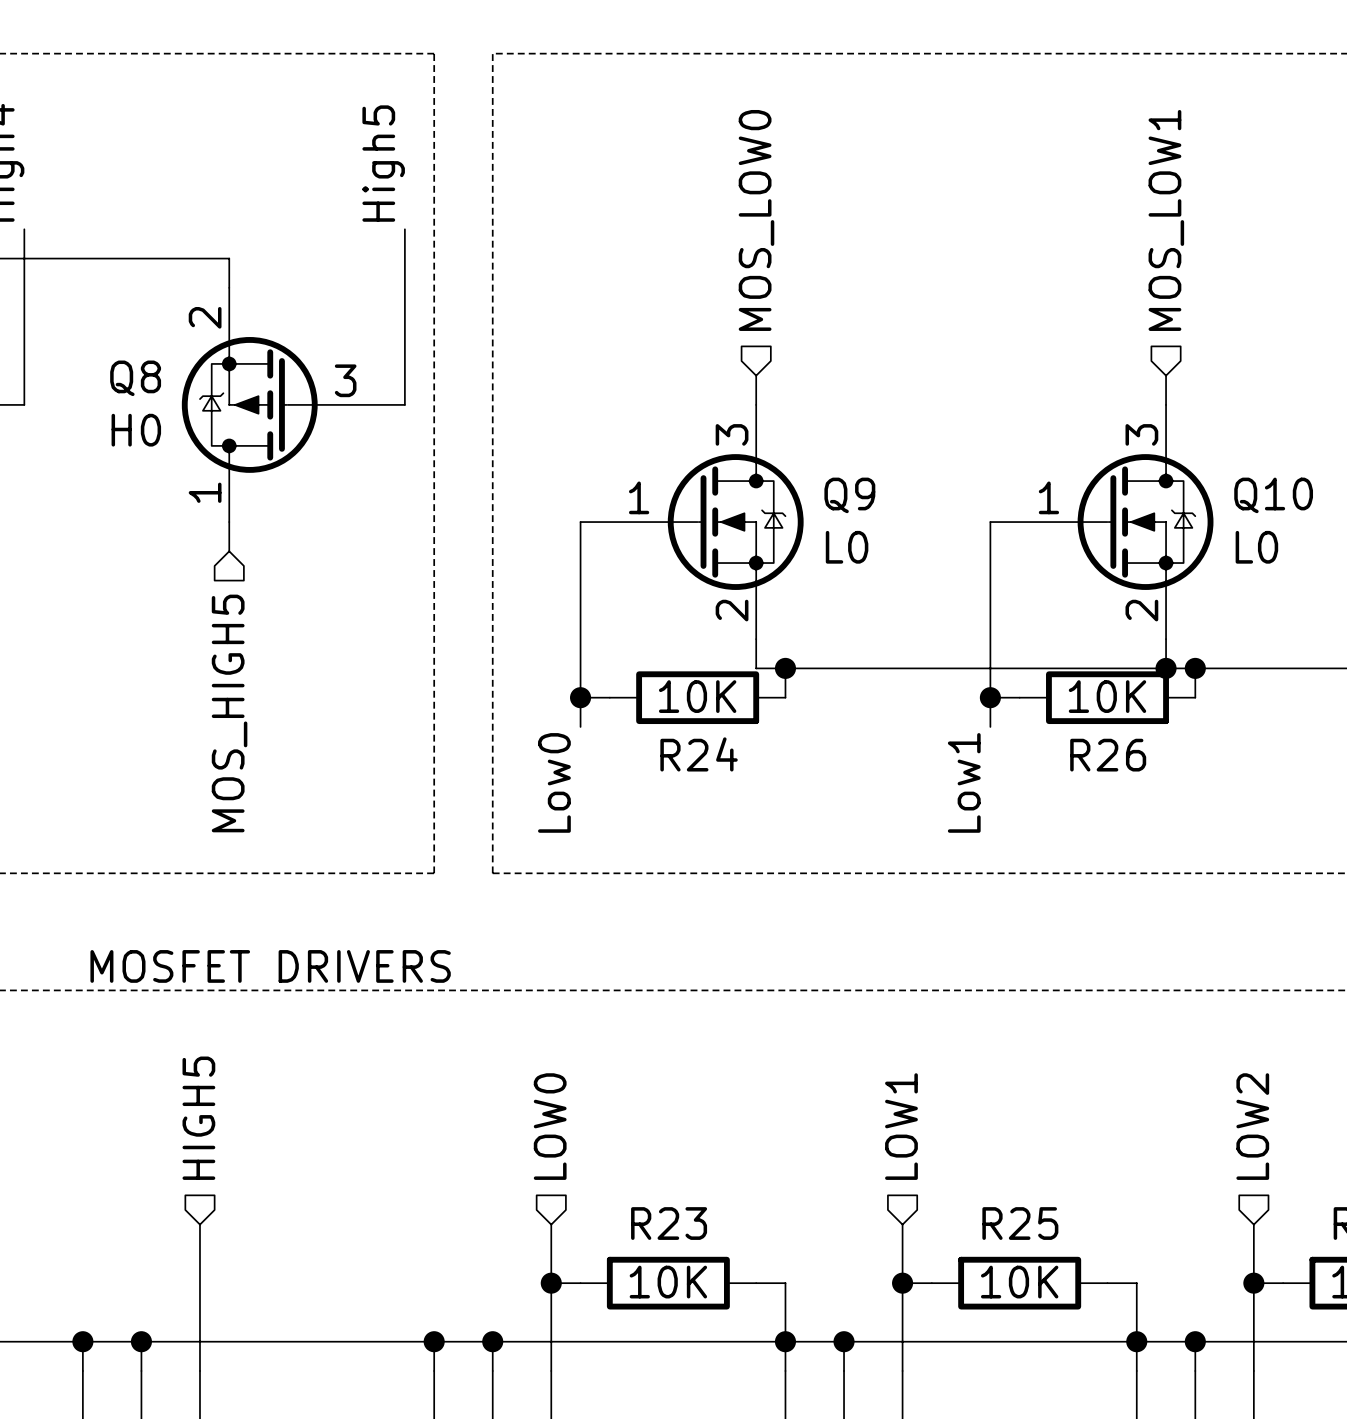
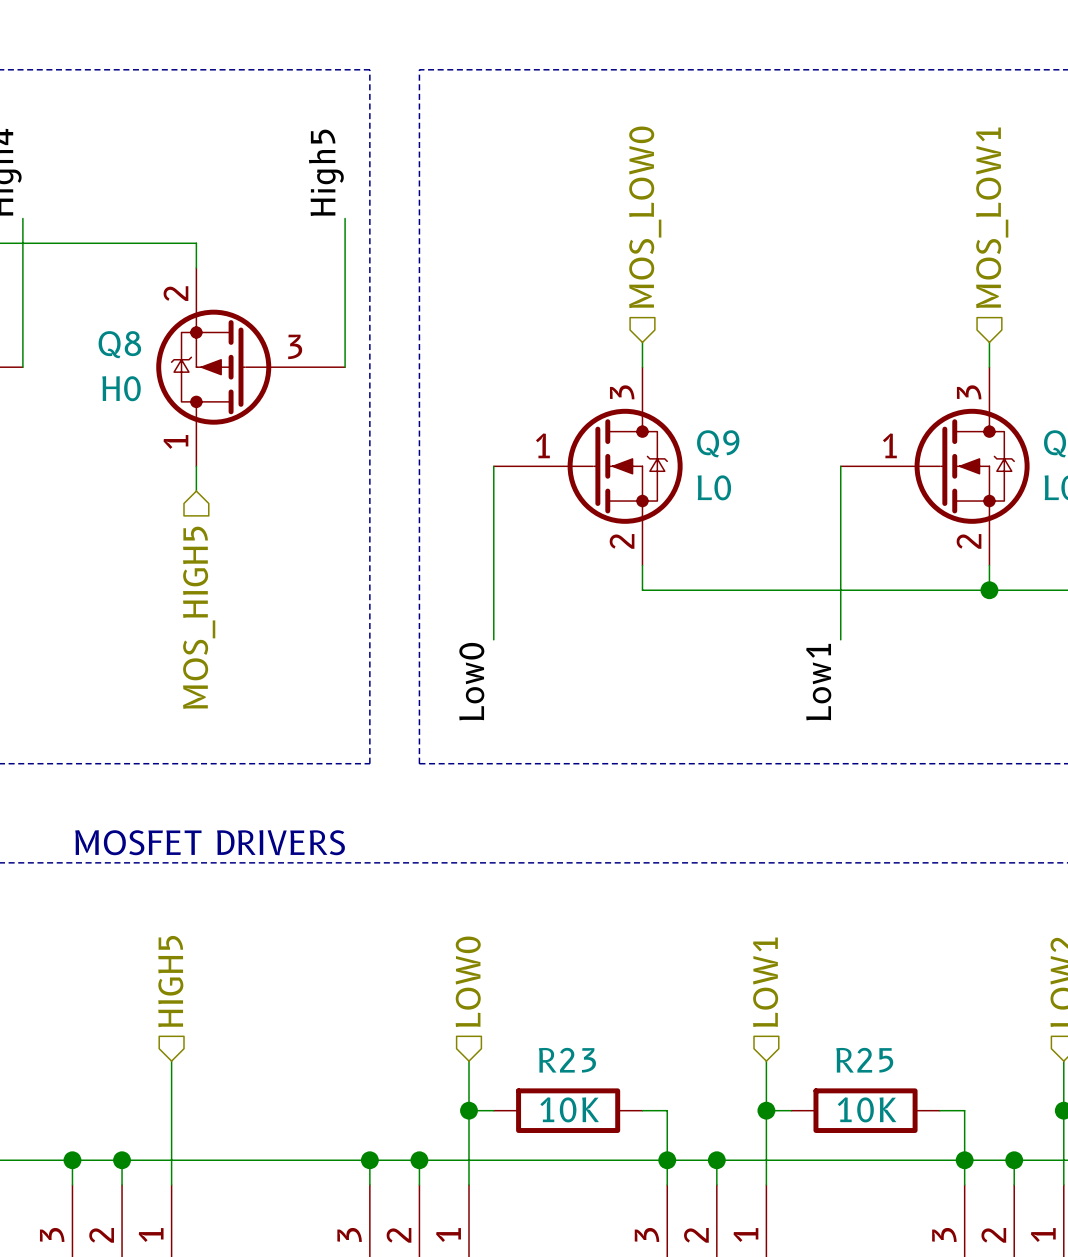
wire: (785, 668) (785, 697) -> none
junction: (785, 668) -> none
wire: (1195, 668) (1195, 697) -> none
junction: (1195, 668) -> none
wire: (580, 697) (609, 697) -> none
junction: (580, 697) -> none
R24: 10K (697, 697) -> none
wire: (990, 697) (1019, 697) -> none
junction: (990, 697) -> none
R26: 10K (1107, 697) -> none

